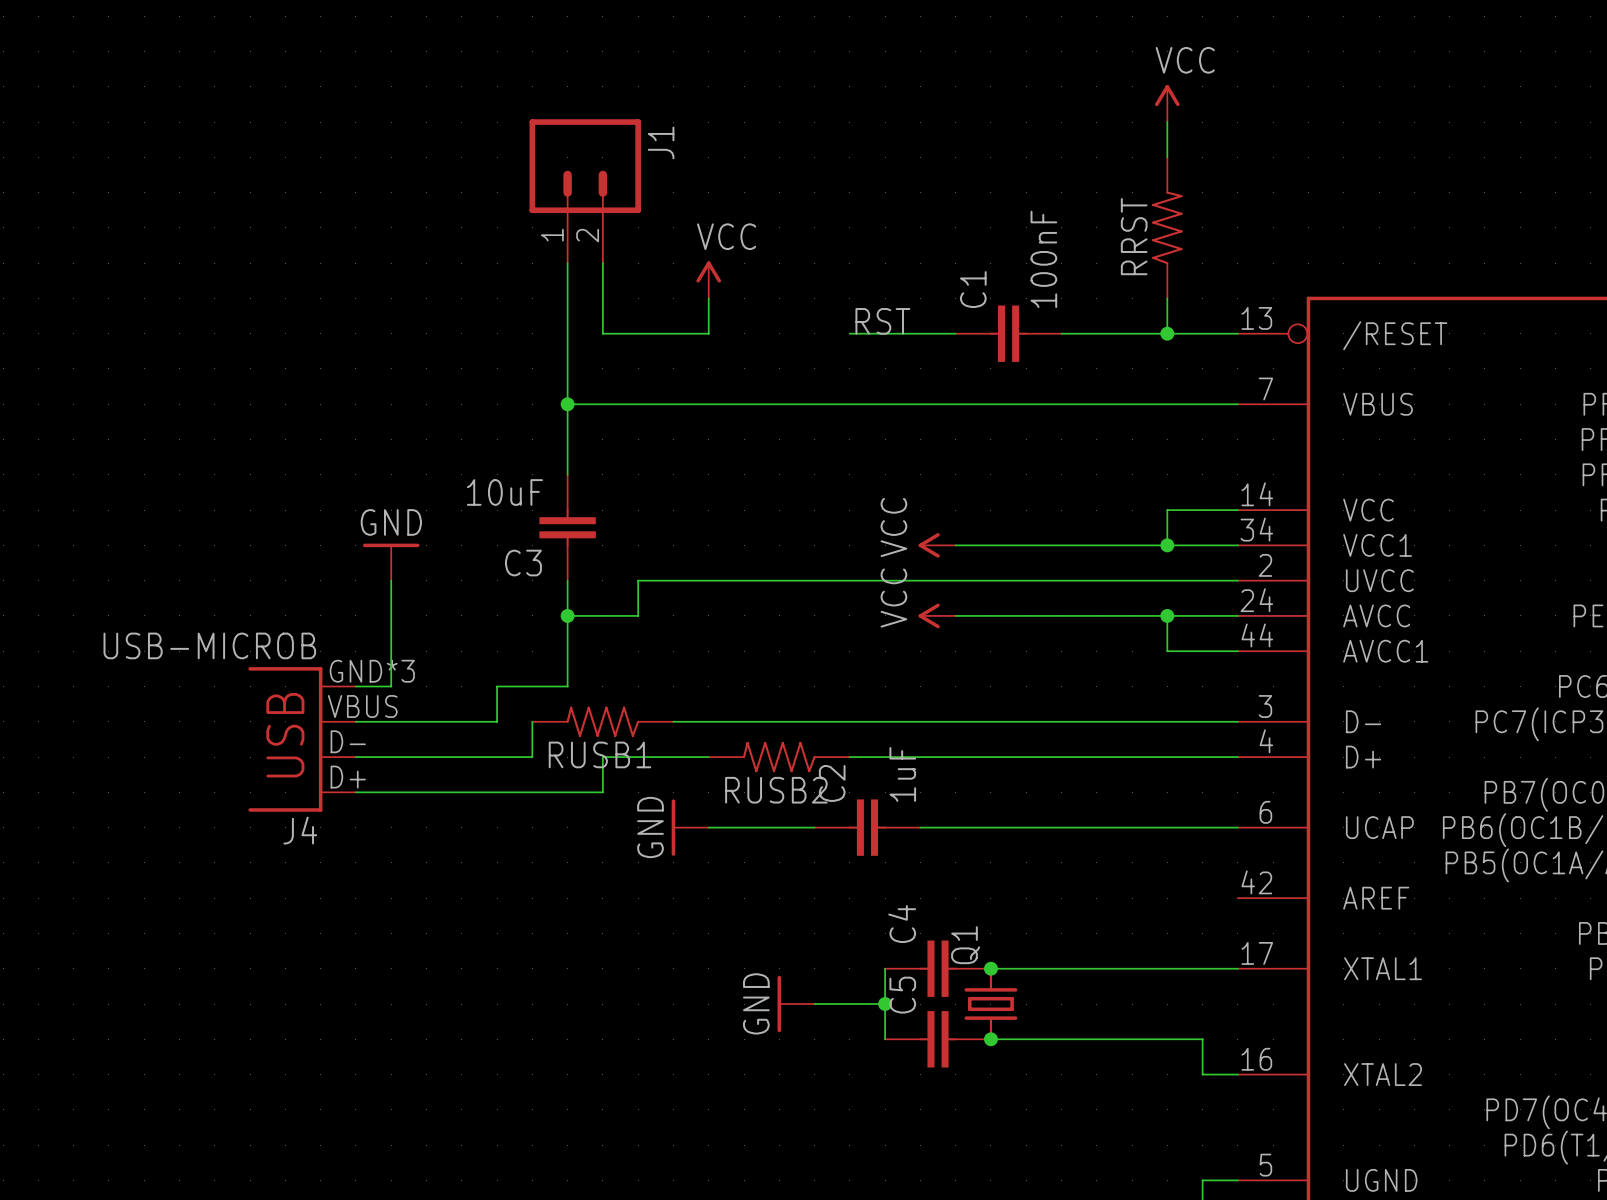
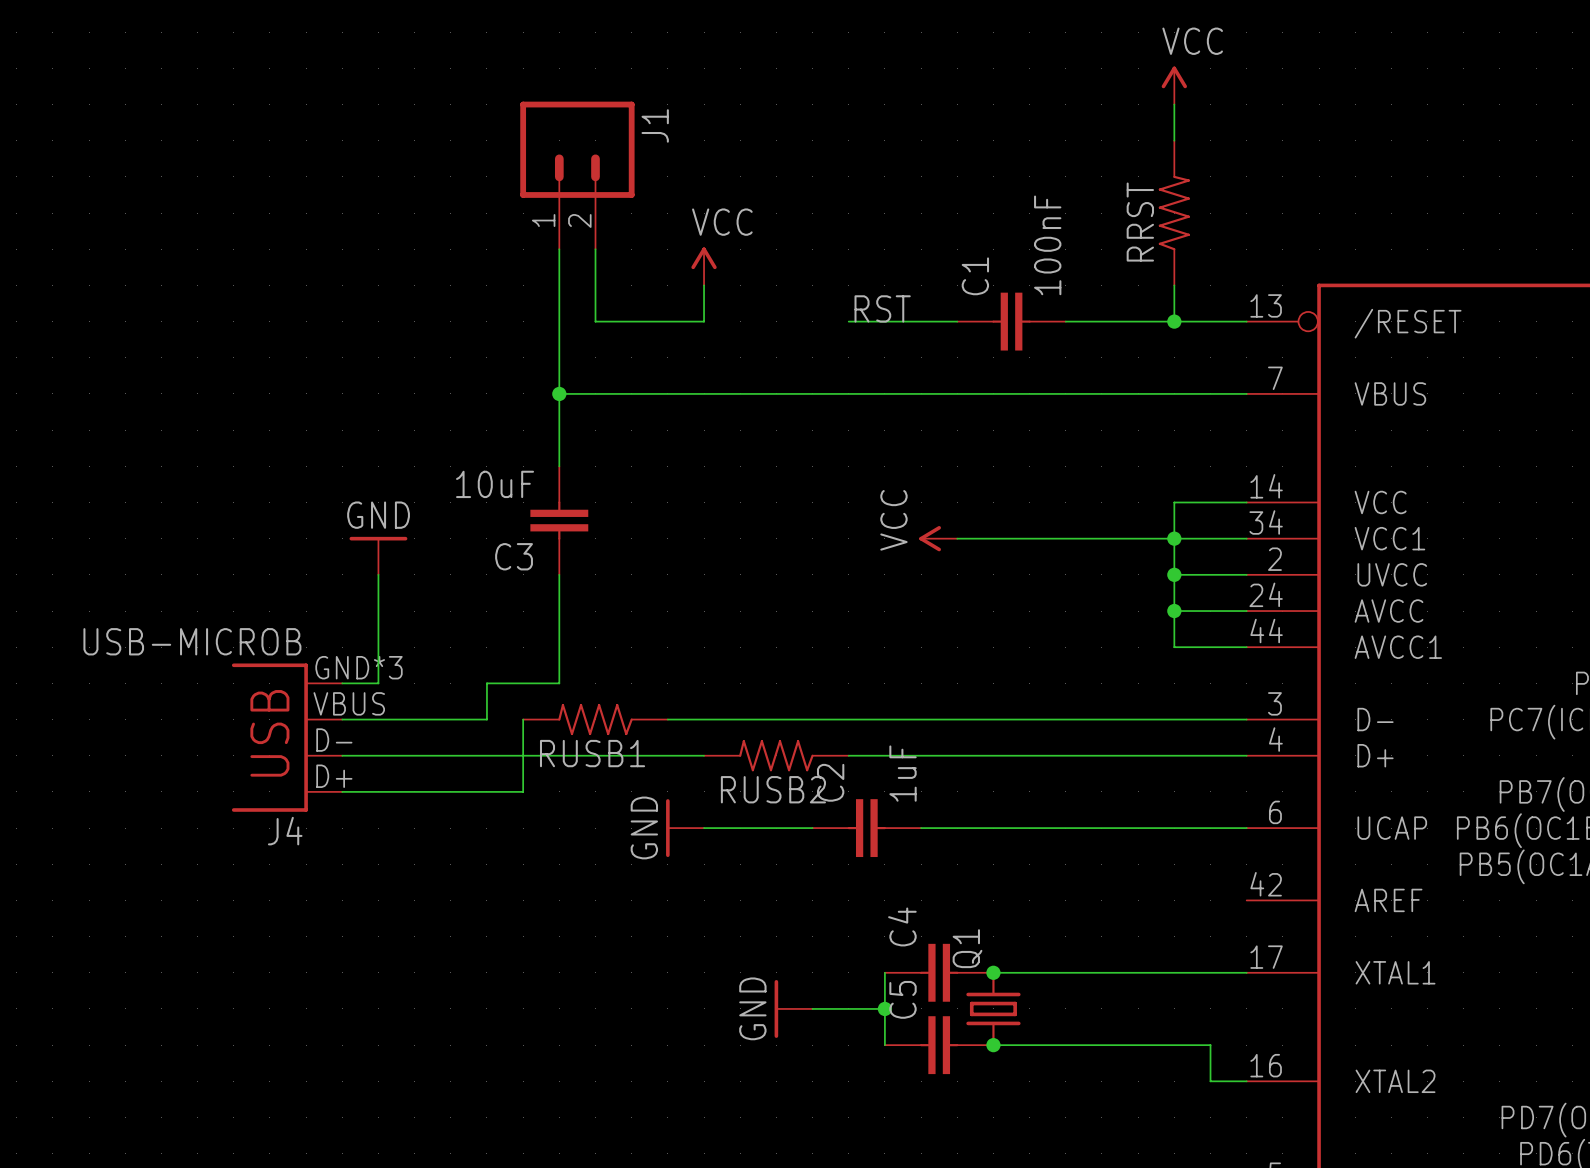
wire: (1167, 580) (638, 580) (638, 615) (567, 615) -> none
junction: none -> (1174, 574)
junction: (567, 615) -> none
power symbol: VCC (937, 615) -> none
wire: (955, 615) (1167, 615) -> (1174, 538) (1174, 611)
wire: (602, 757) (602, 792) (532, 792) -> (595, 755) (523, 755) (523, 791)

